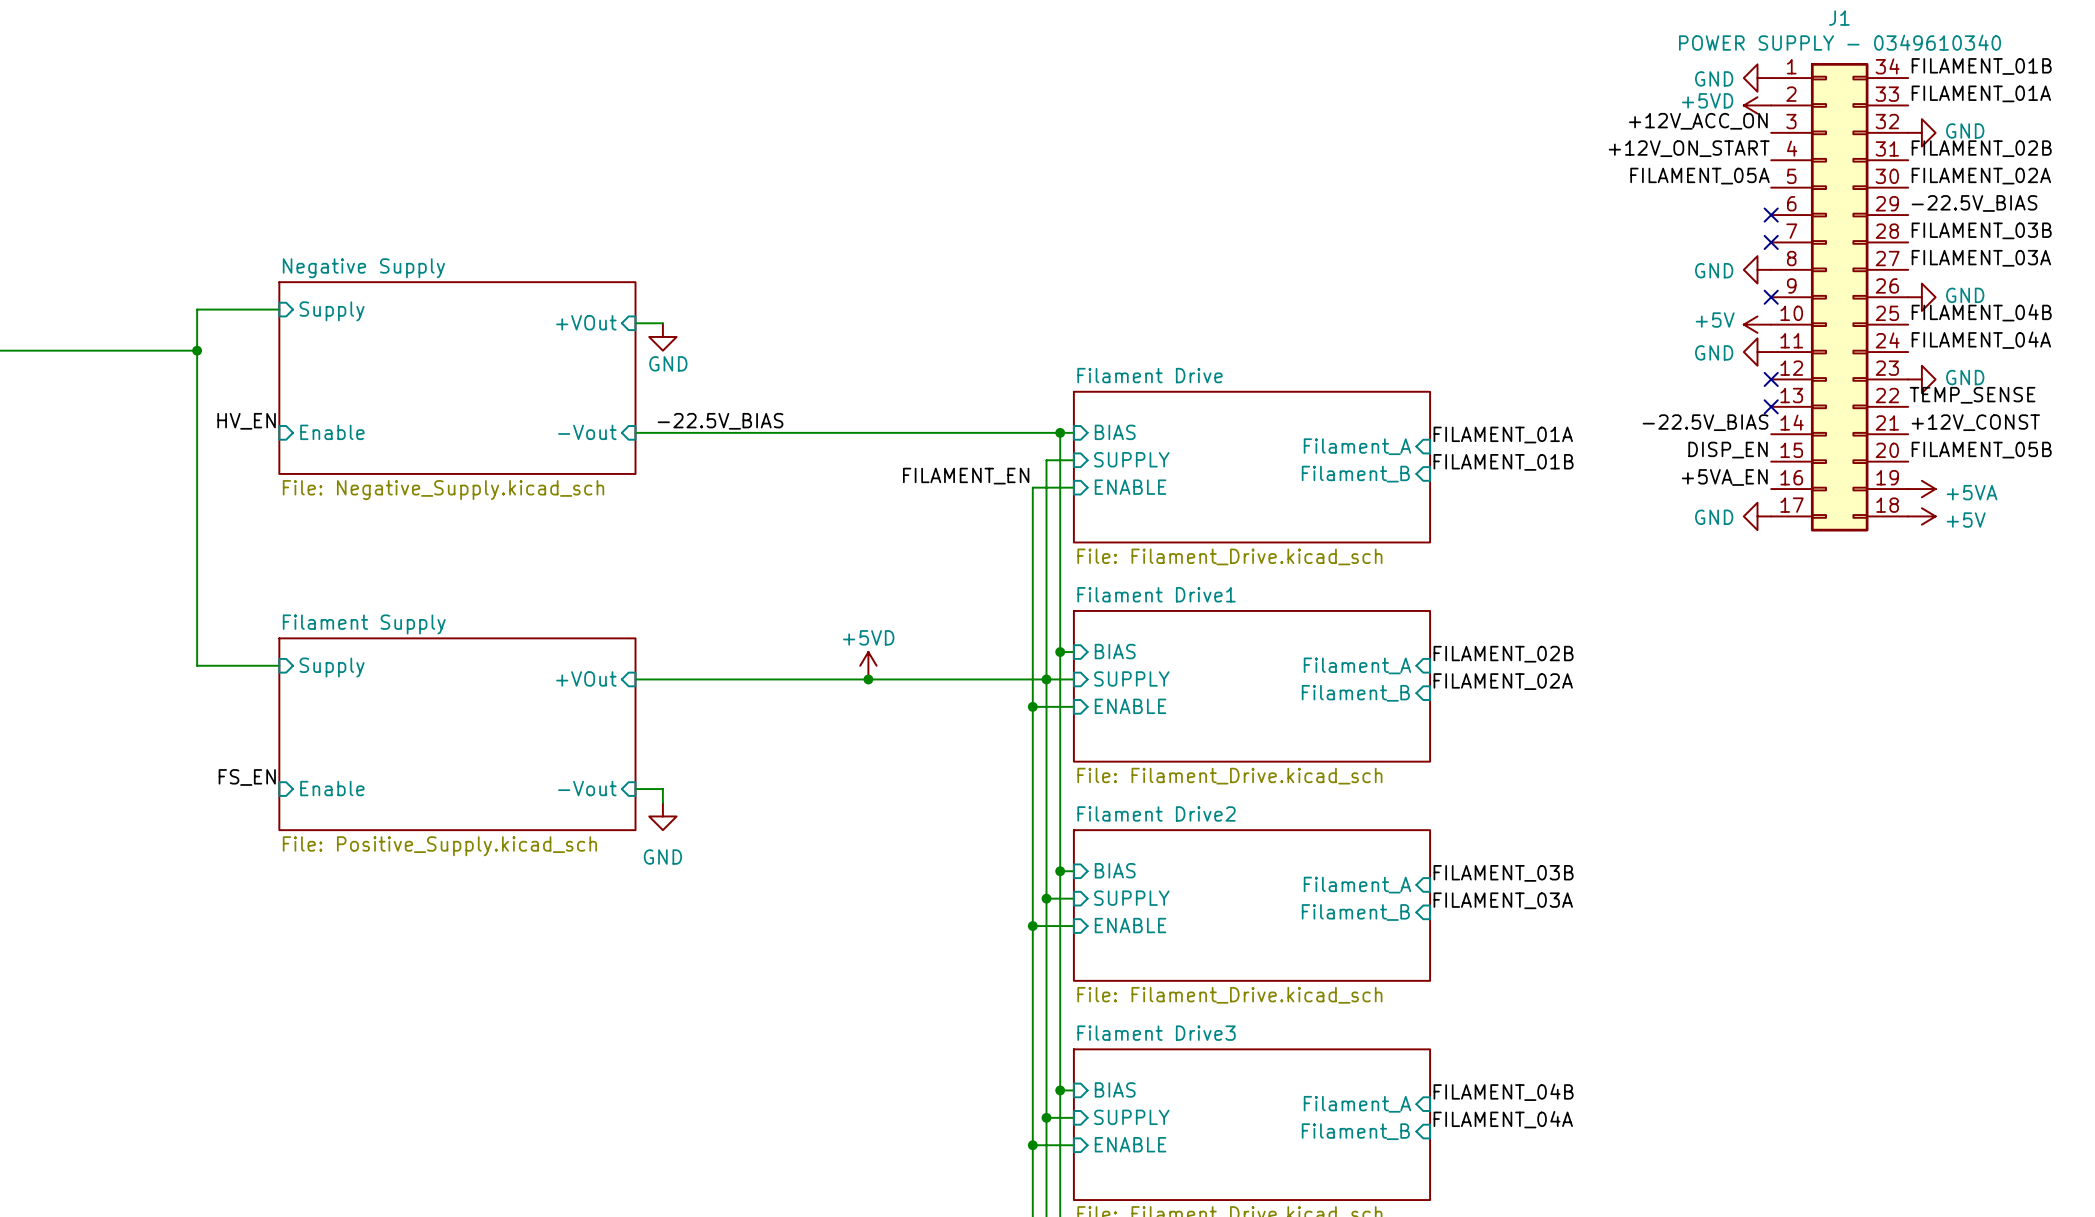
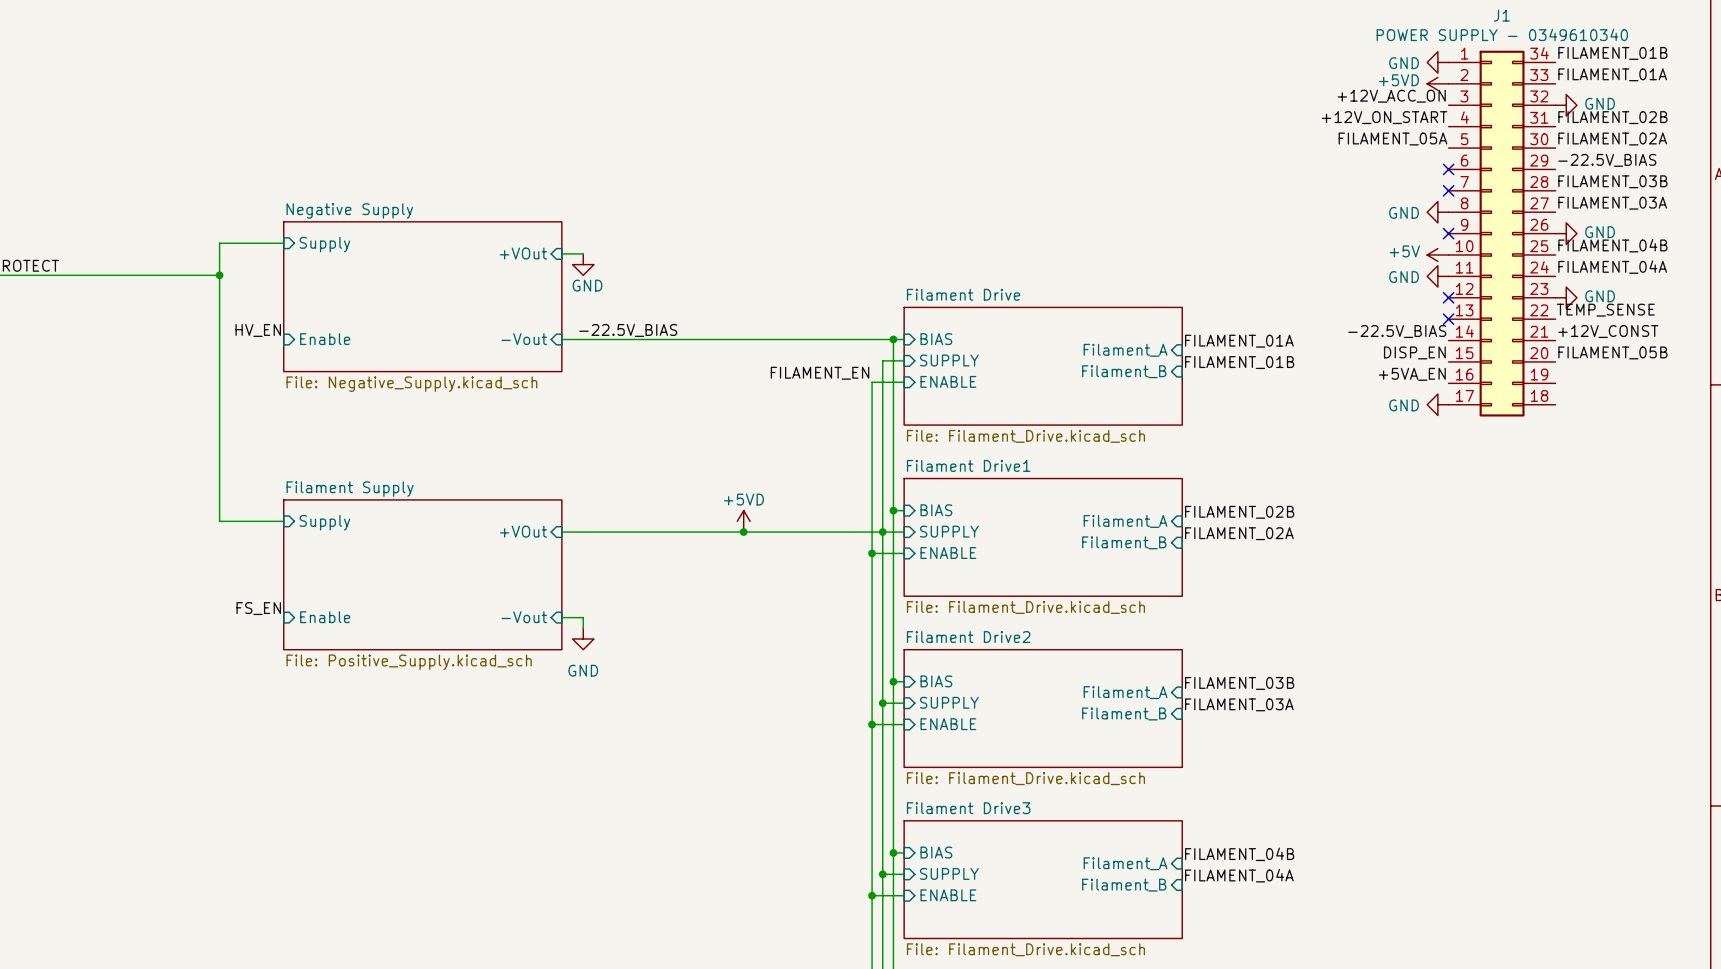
power symbol: +5VA (1921, 489) -> none
power symbol: +5V (1921, 516) -> none

